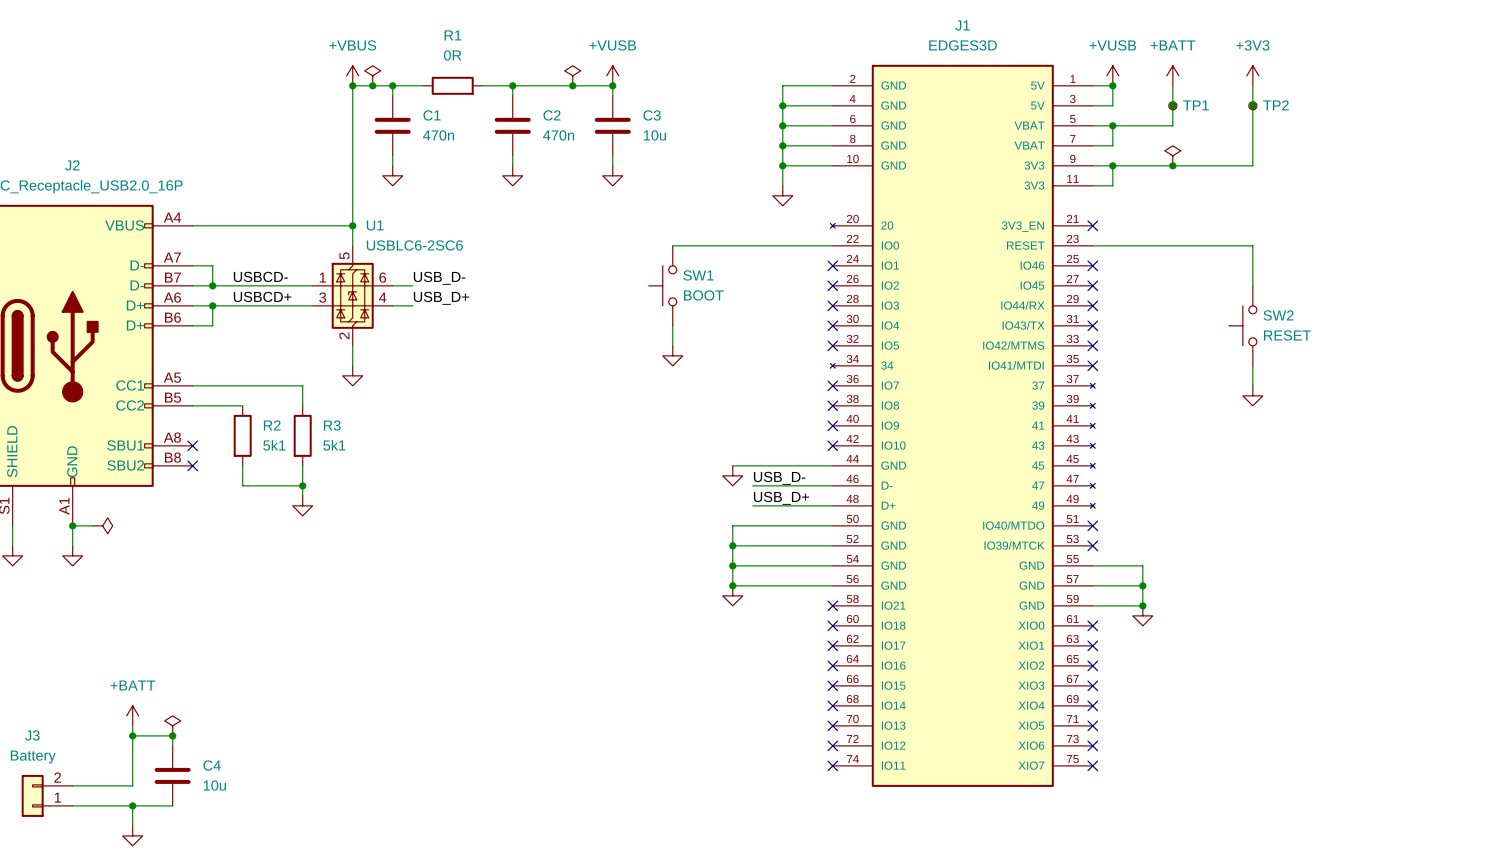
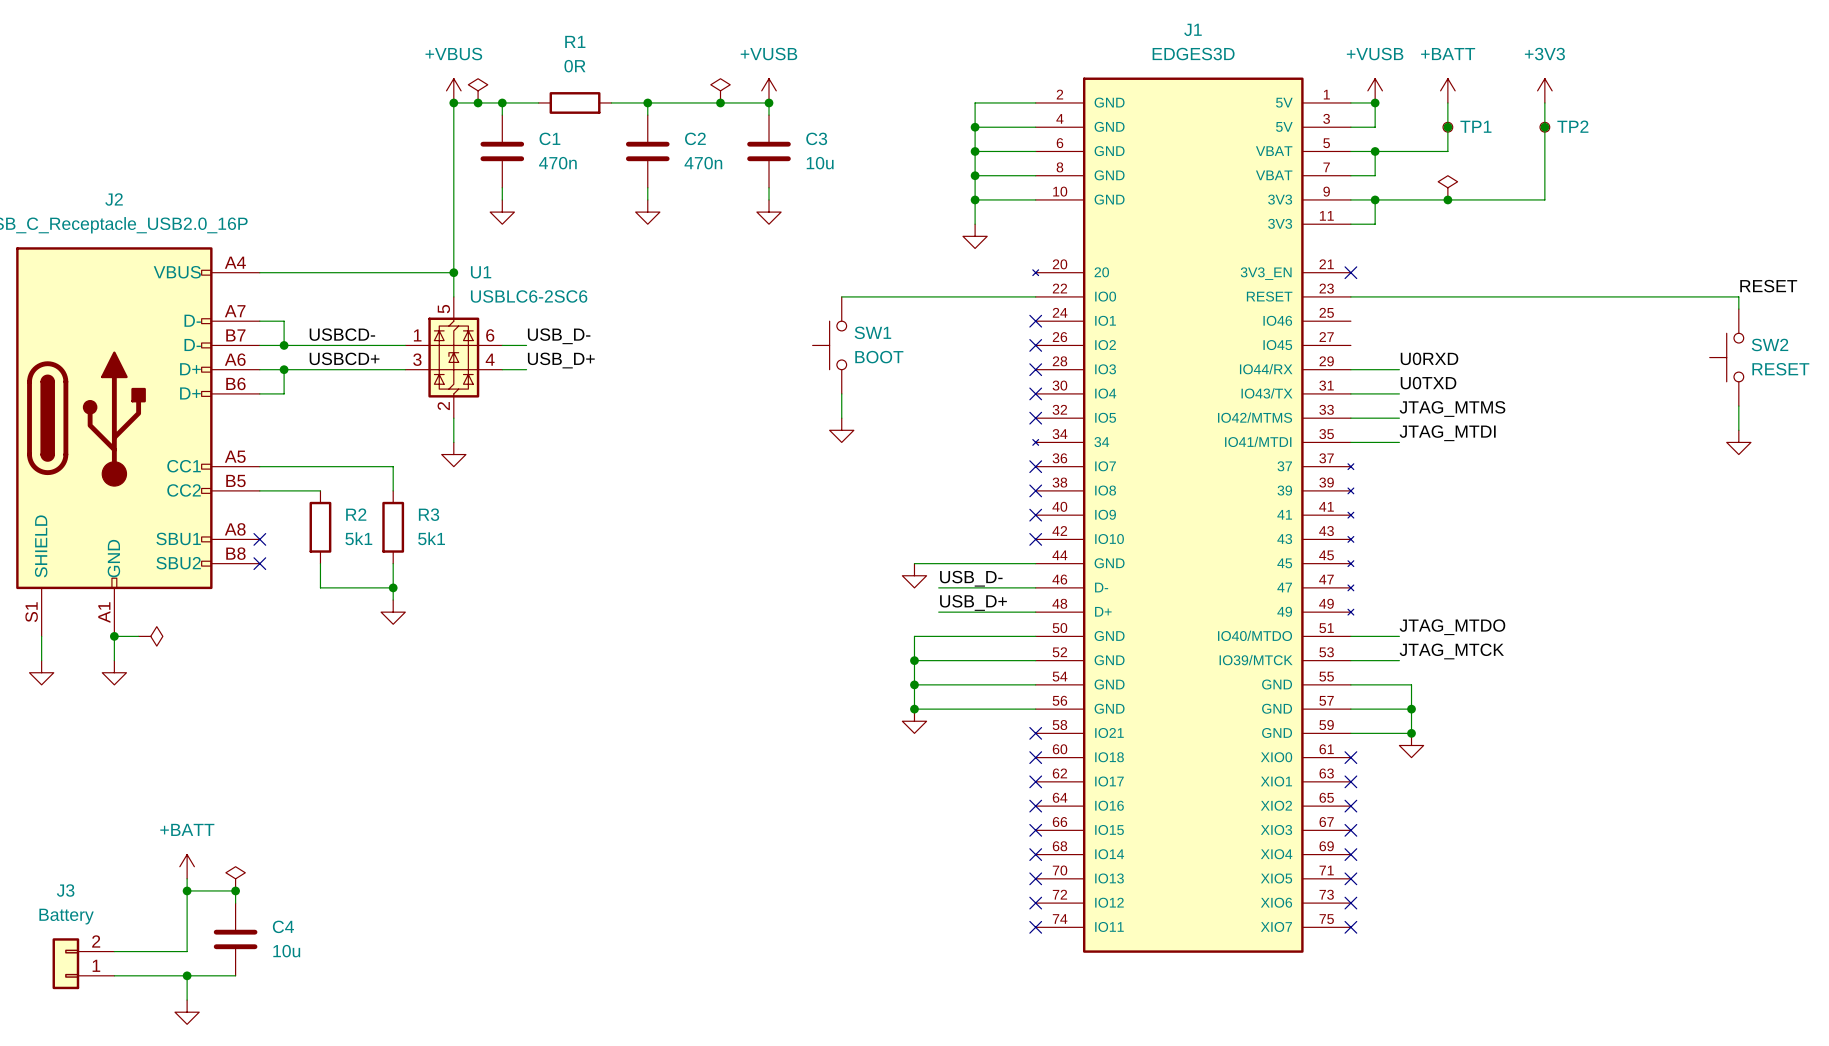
label: none -> RESET (1768, 286)
wire: (1252, 245) (1252, 285) -> (1544, 296) (1738, 296) (1738, 309)
no-connect mark: (1092, 265) -> none
no-connect mark: (1092, 285) -> none
label: none -> U0RXD (1429, 358)
wire: none -> (1350, 369) (1399, 369)
no-connect mark: (1092, 305) -> none
label: none -> U0TXD (1428, 383)
wire: none -> (1350, 393) (1399, 393)
no-connect mark: (1092, 325) -> none
SW2 position: (1242, 325) -> (1726, 357)
label: none -> JTAG_MTMS (1452, 409)
wire: none -> (1350, 418) (1399, 418)
no-connect mark: (1092, 345) -> none
label: none -> JTAG_MTDI (1447, 433)
wire: none -> (1350, 442) (1399, 442)
no-connect mark: (1092, 365) -> none
wire: (1252, 365) (1252, 385) -> (1738, 406) (1738, 430)
power symbol position: (1252, 395) -> (1738, 442)
label: none -> JTAG_MTDO (1452, 627)
wire: none -> (1350, 636) (1399, 636)
no-connect mark: (1092, 525) -> none
label: none -> JTAG_MTCK (1451, 651)
wire: none -> (1350, 660) (1399, 660)
no-connect mark: (1092, 545) -> none

